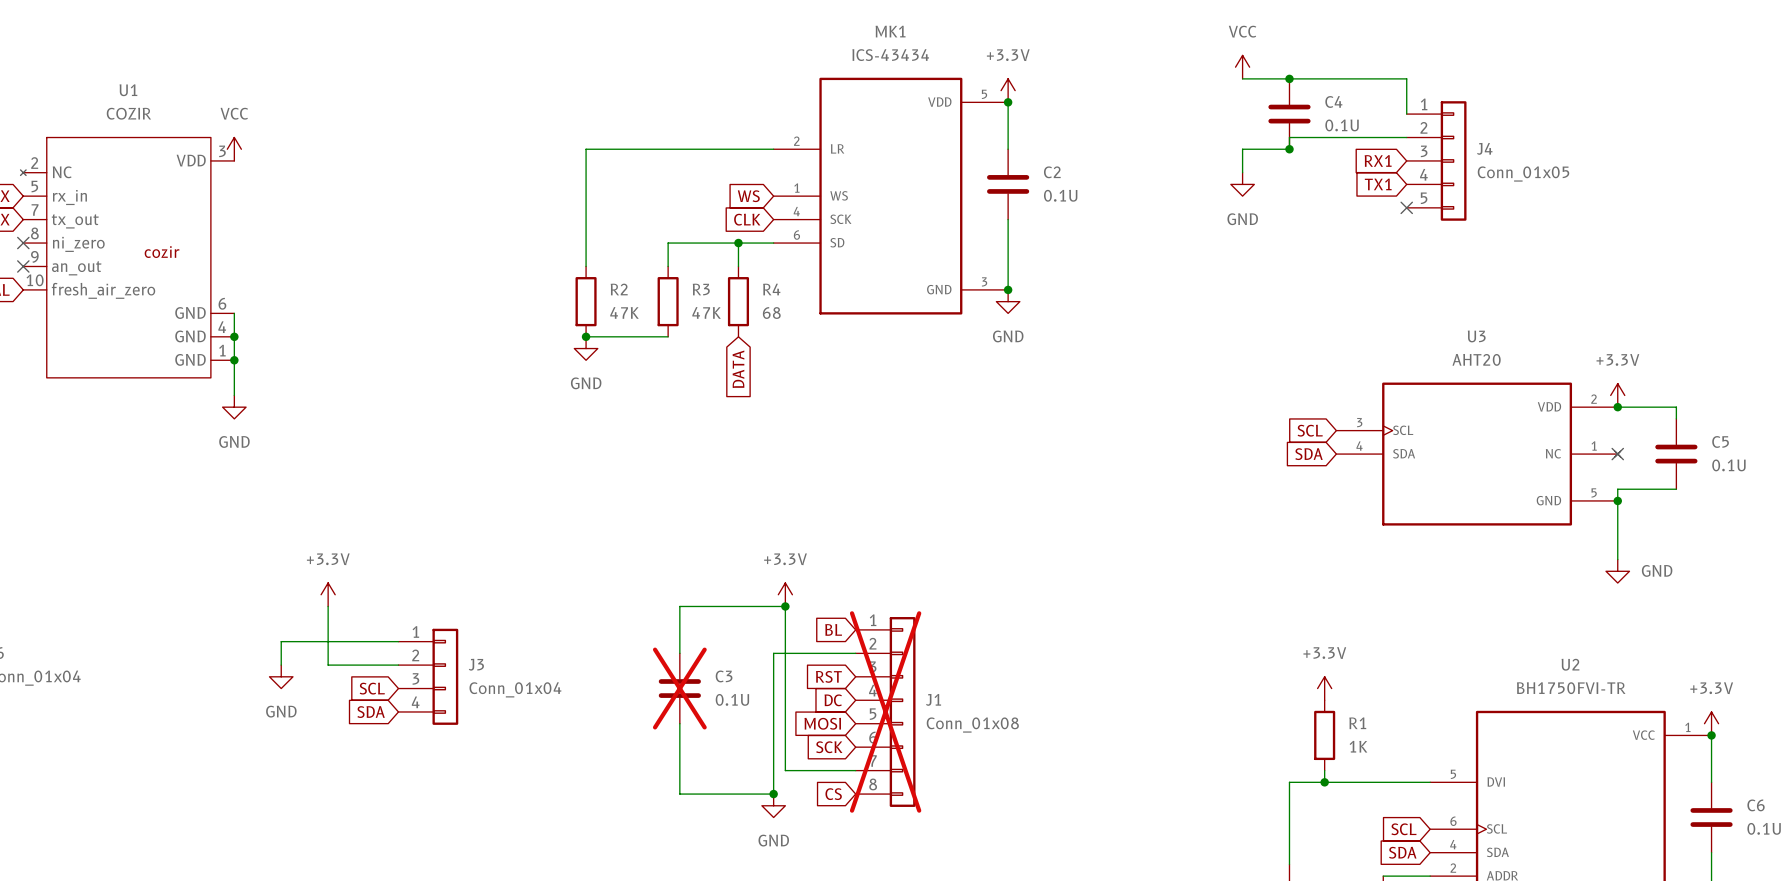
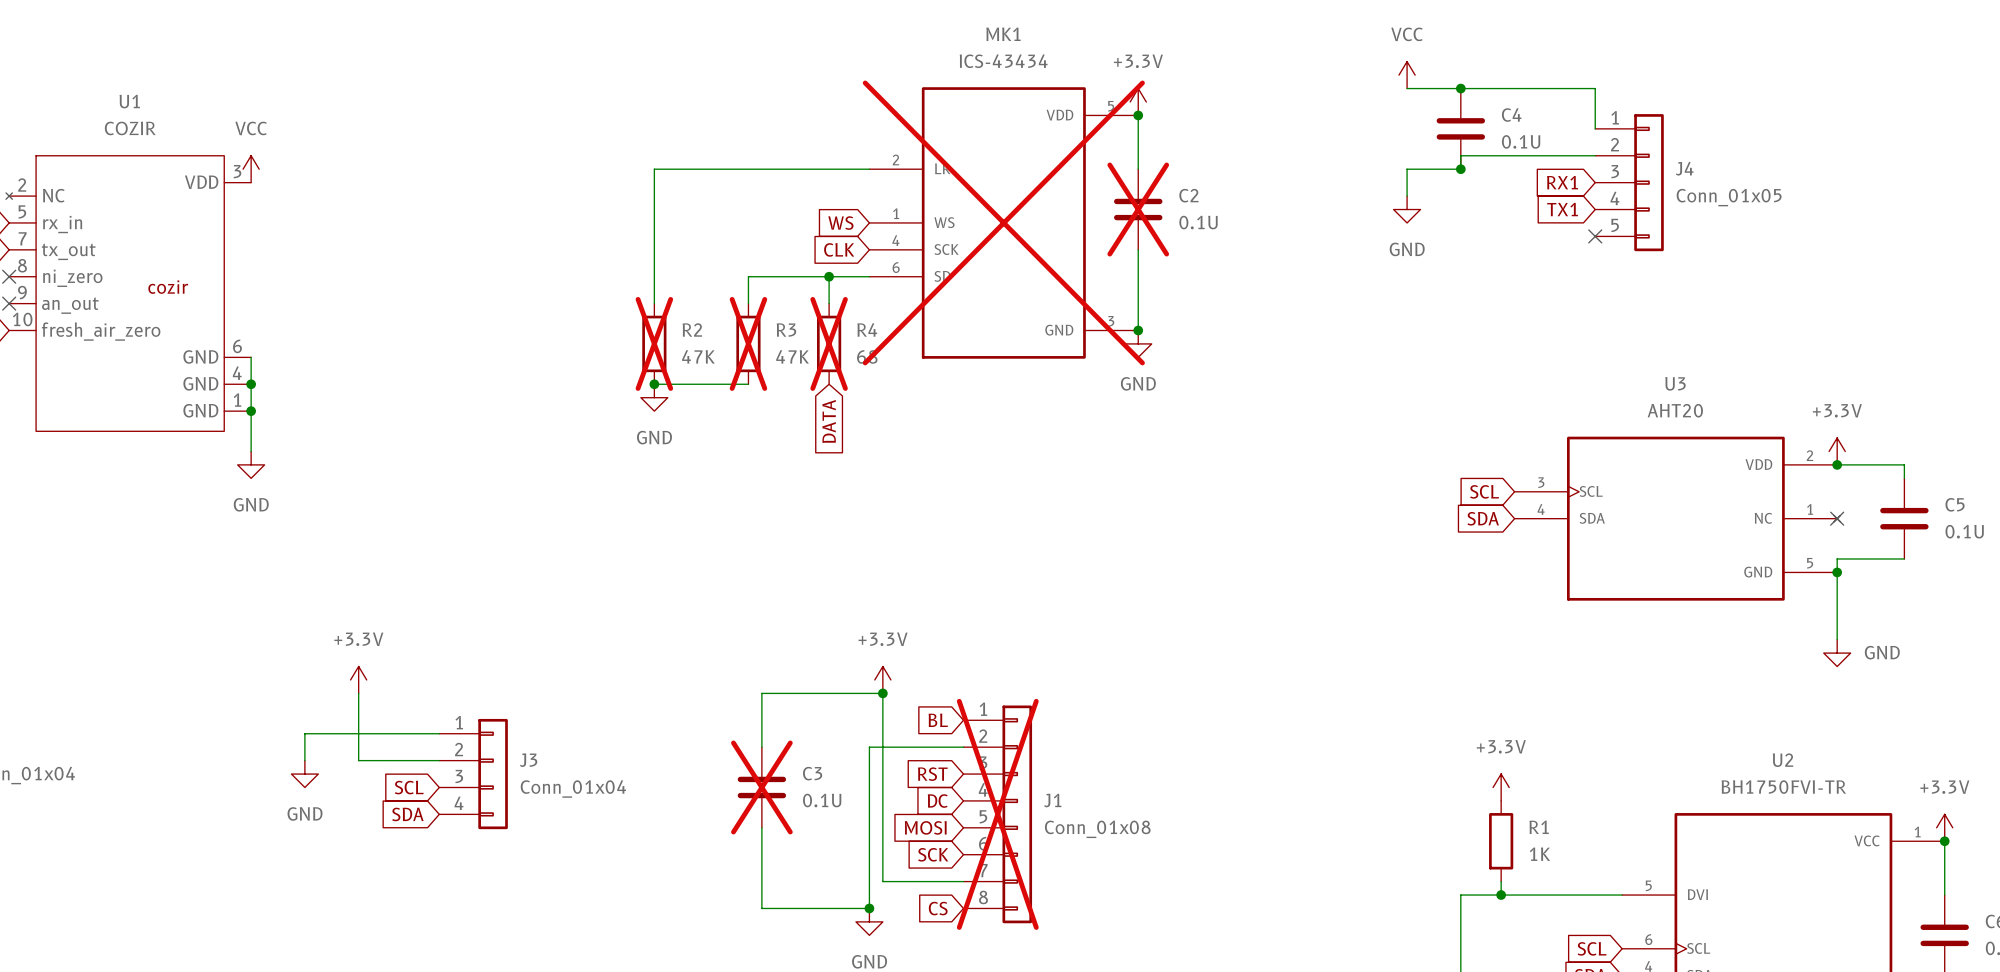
C2 do-not-place cross: none -> (1138, 209)
MK1 do-not-place cross: none -> (1003, 222)
R2 do-not-place cross: none -> (654, 343)
R3 do-not-place cross: none -> (748, 343)
R4 do-not-place cross: none -> (829, 343)

